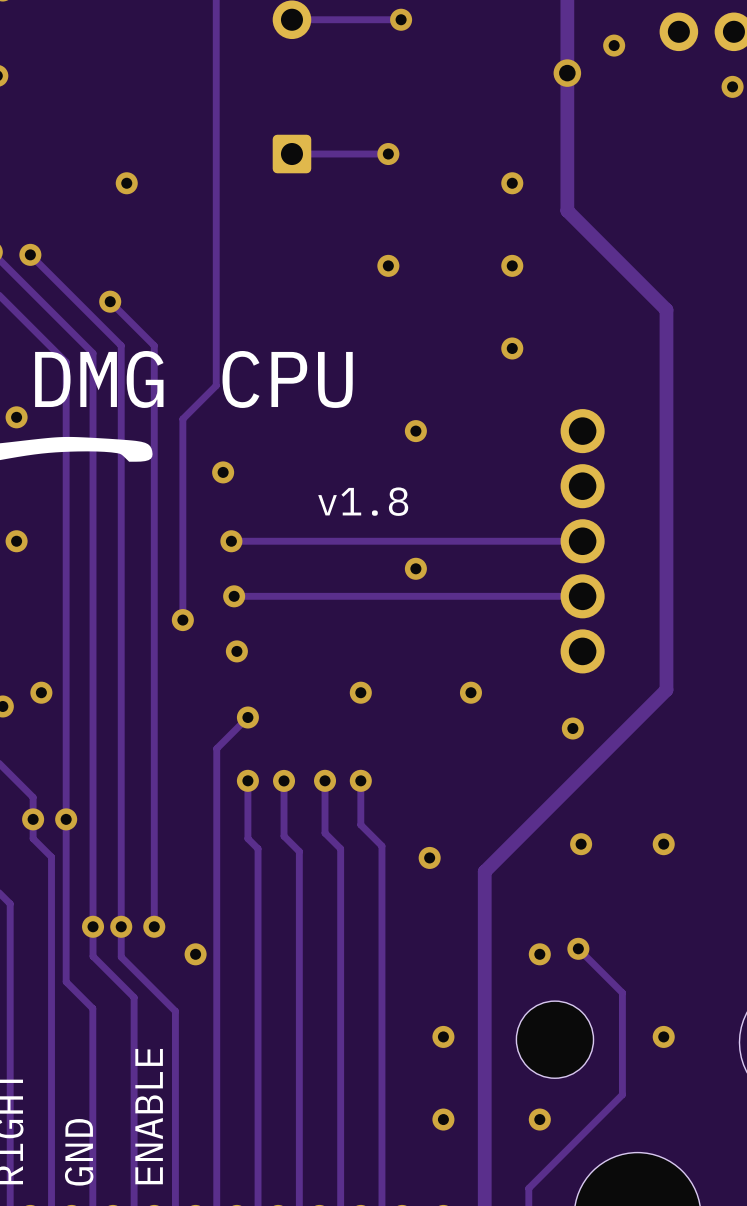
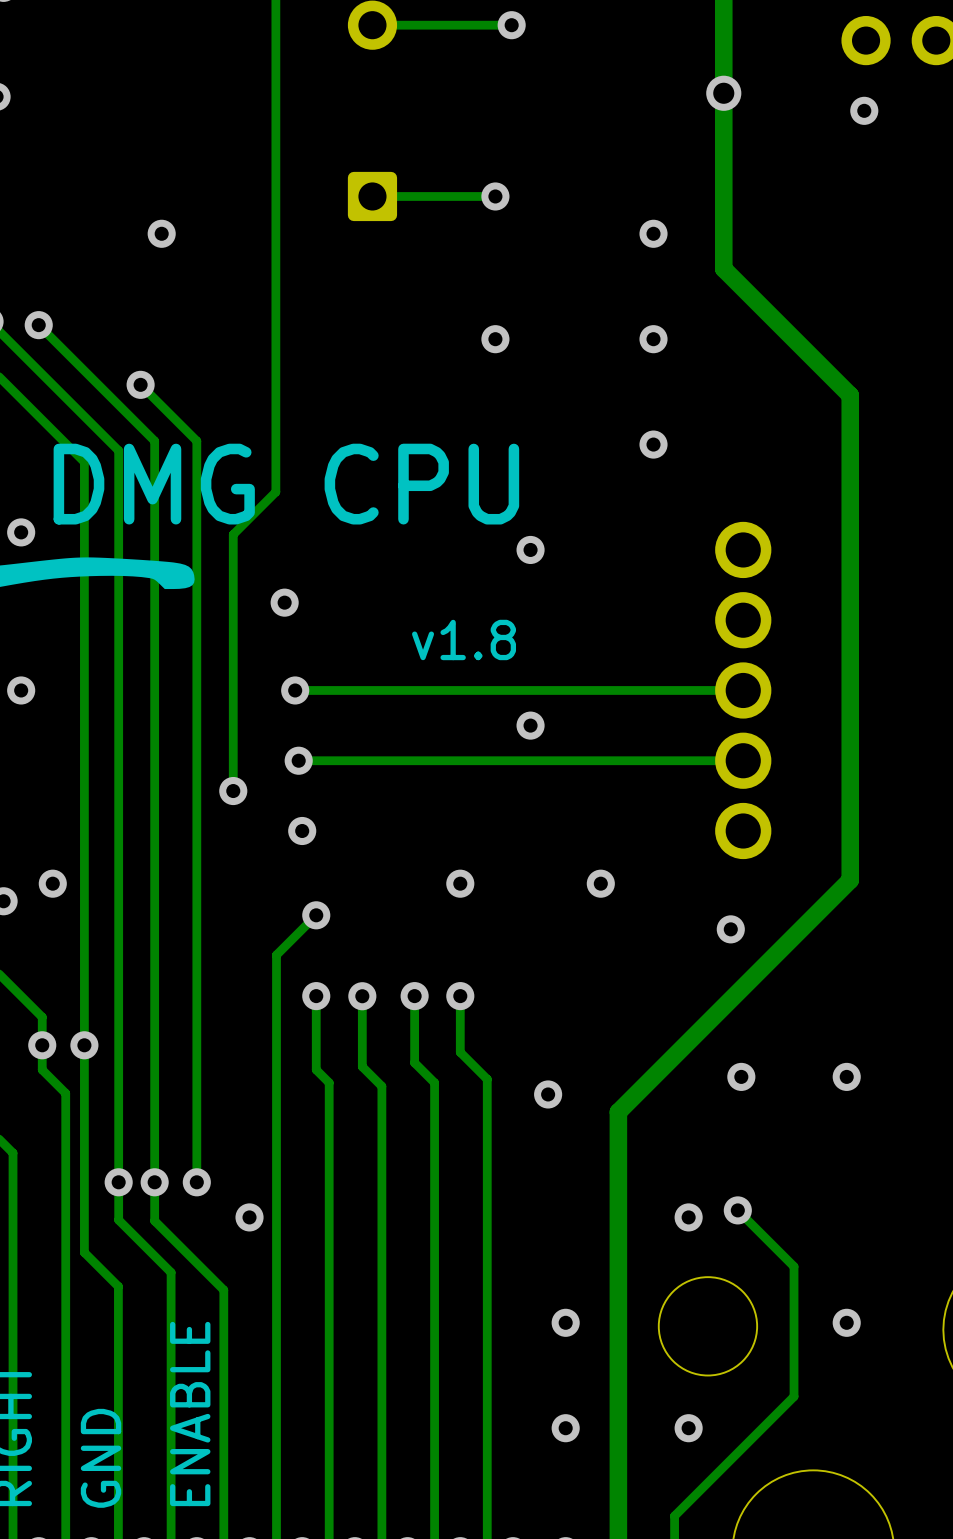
via: (614, 45) -> none
via: none -> (864, 110)
via: (732, 86) -> none

